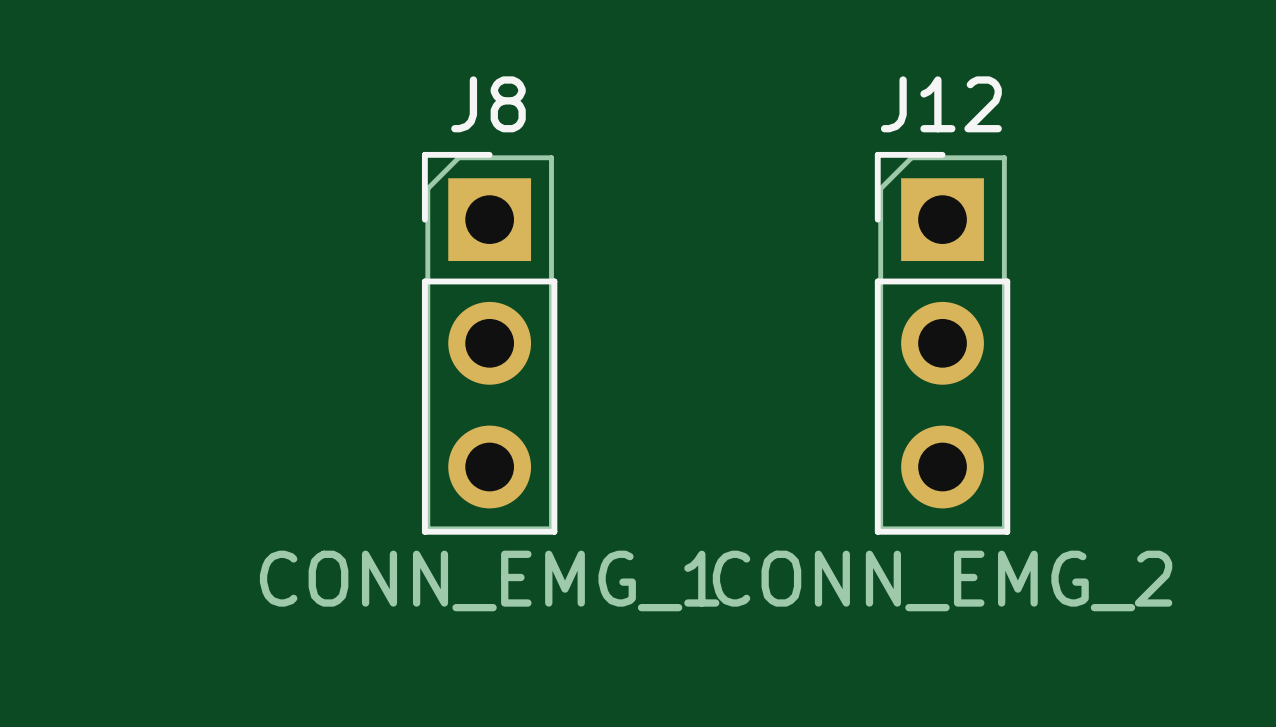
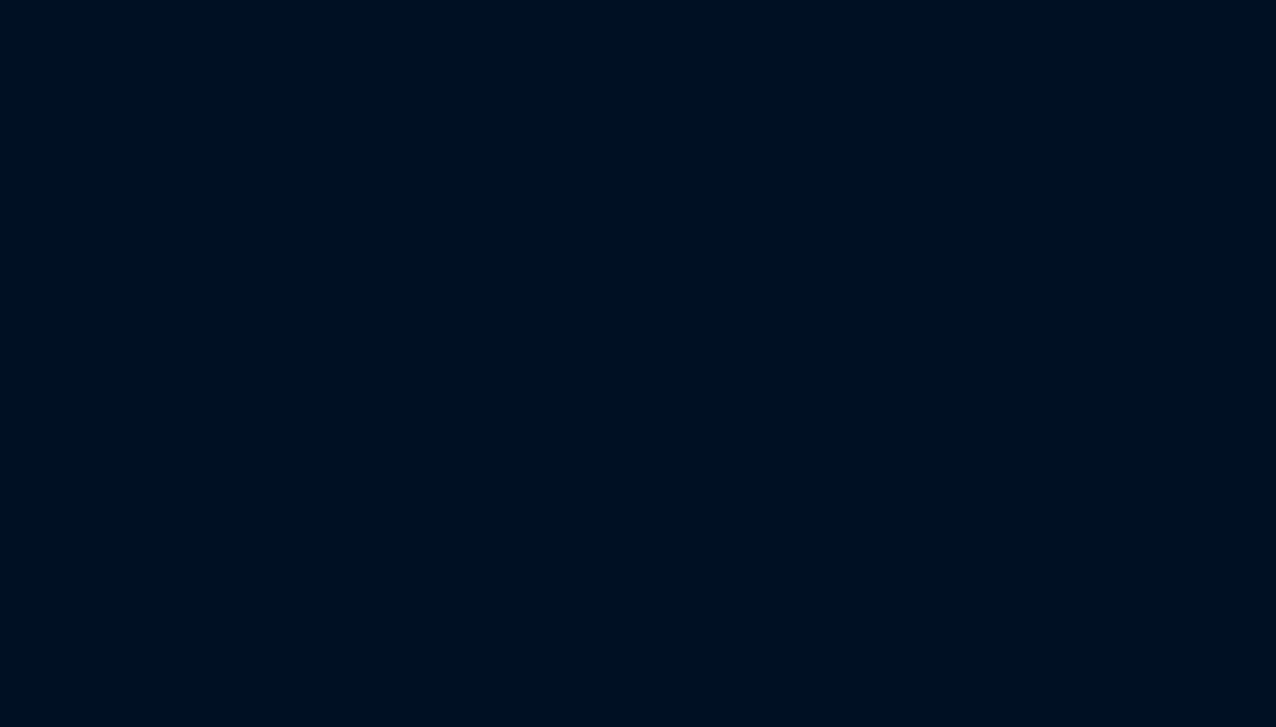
J8: CONN_EMG_1 (489, 343) -> none
J12: CONN_EMG_2 (942, 343) -> none

